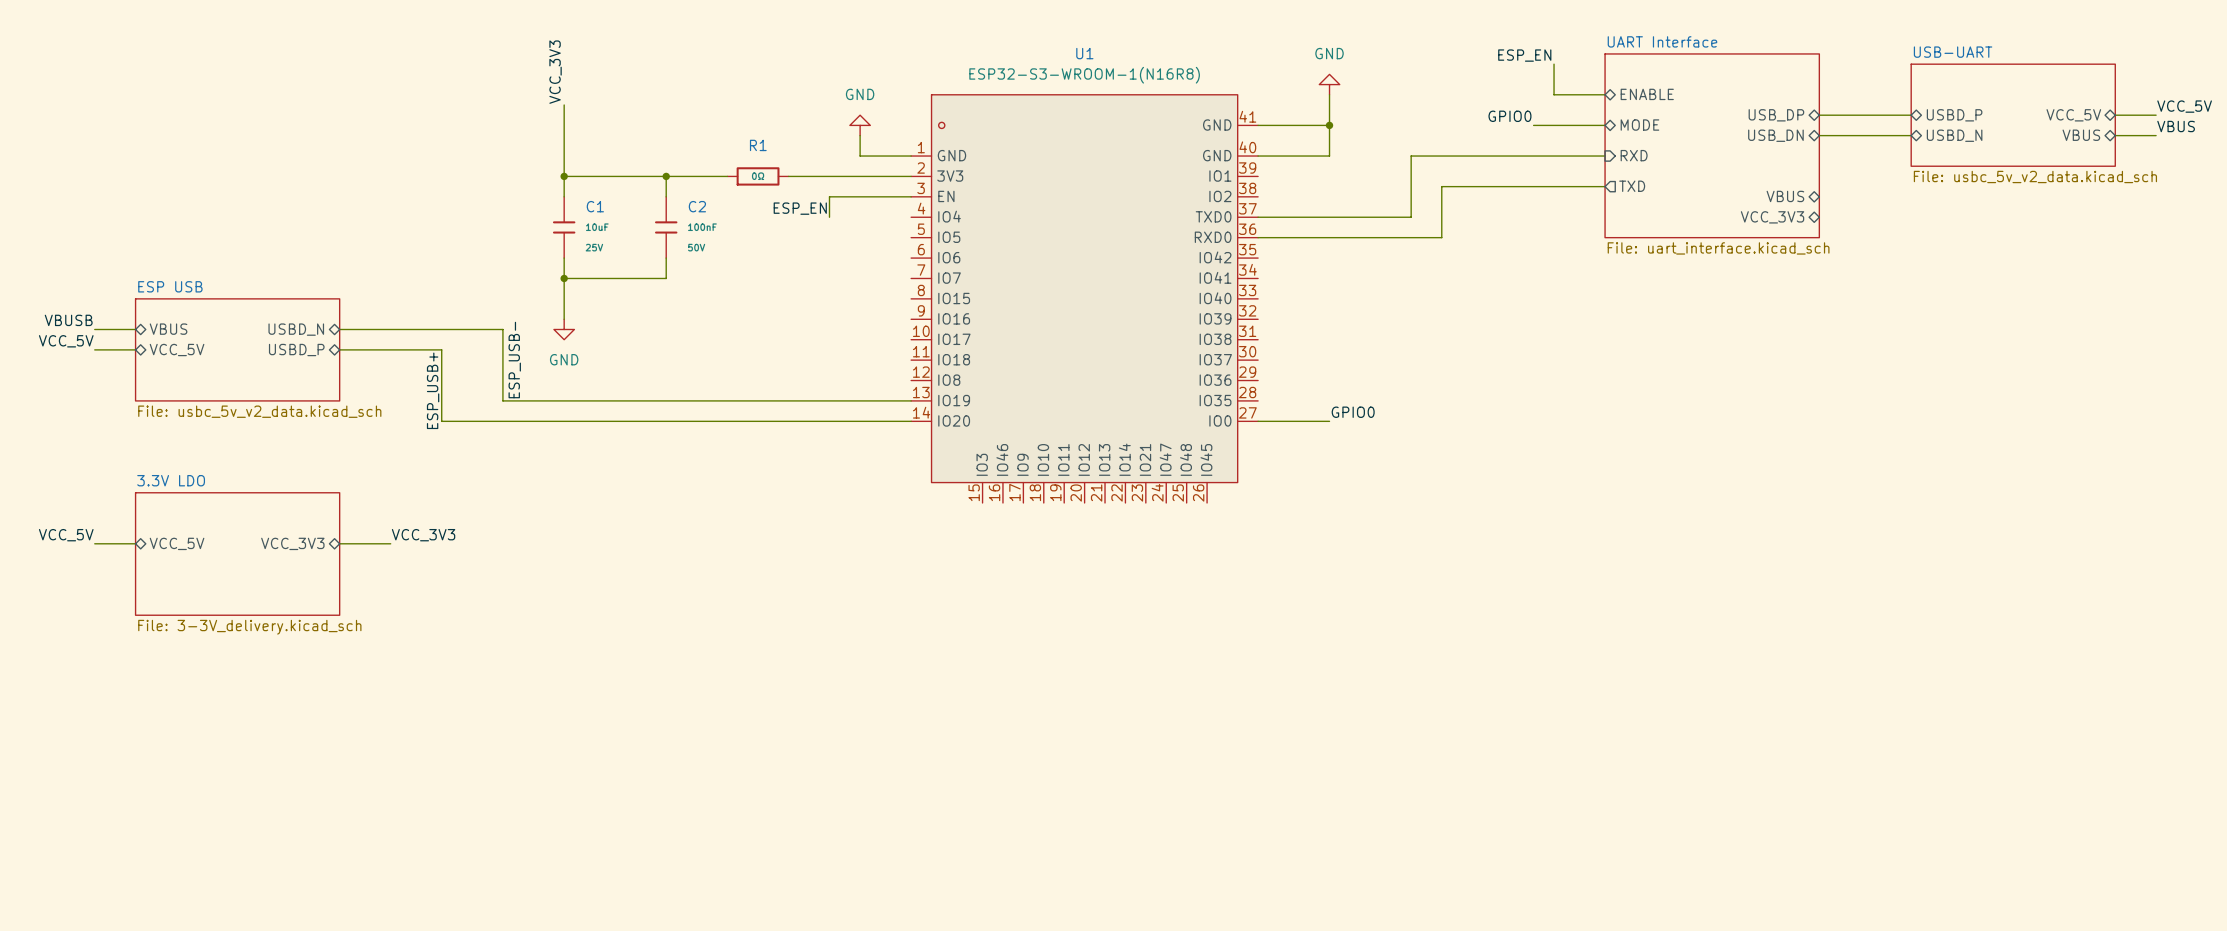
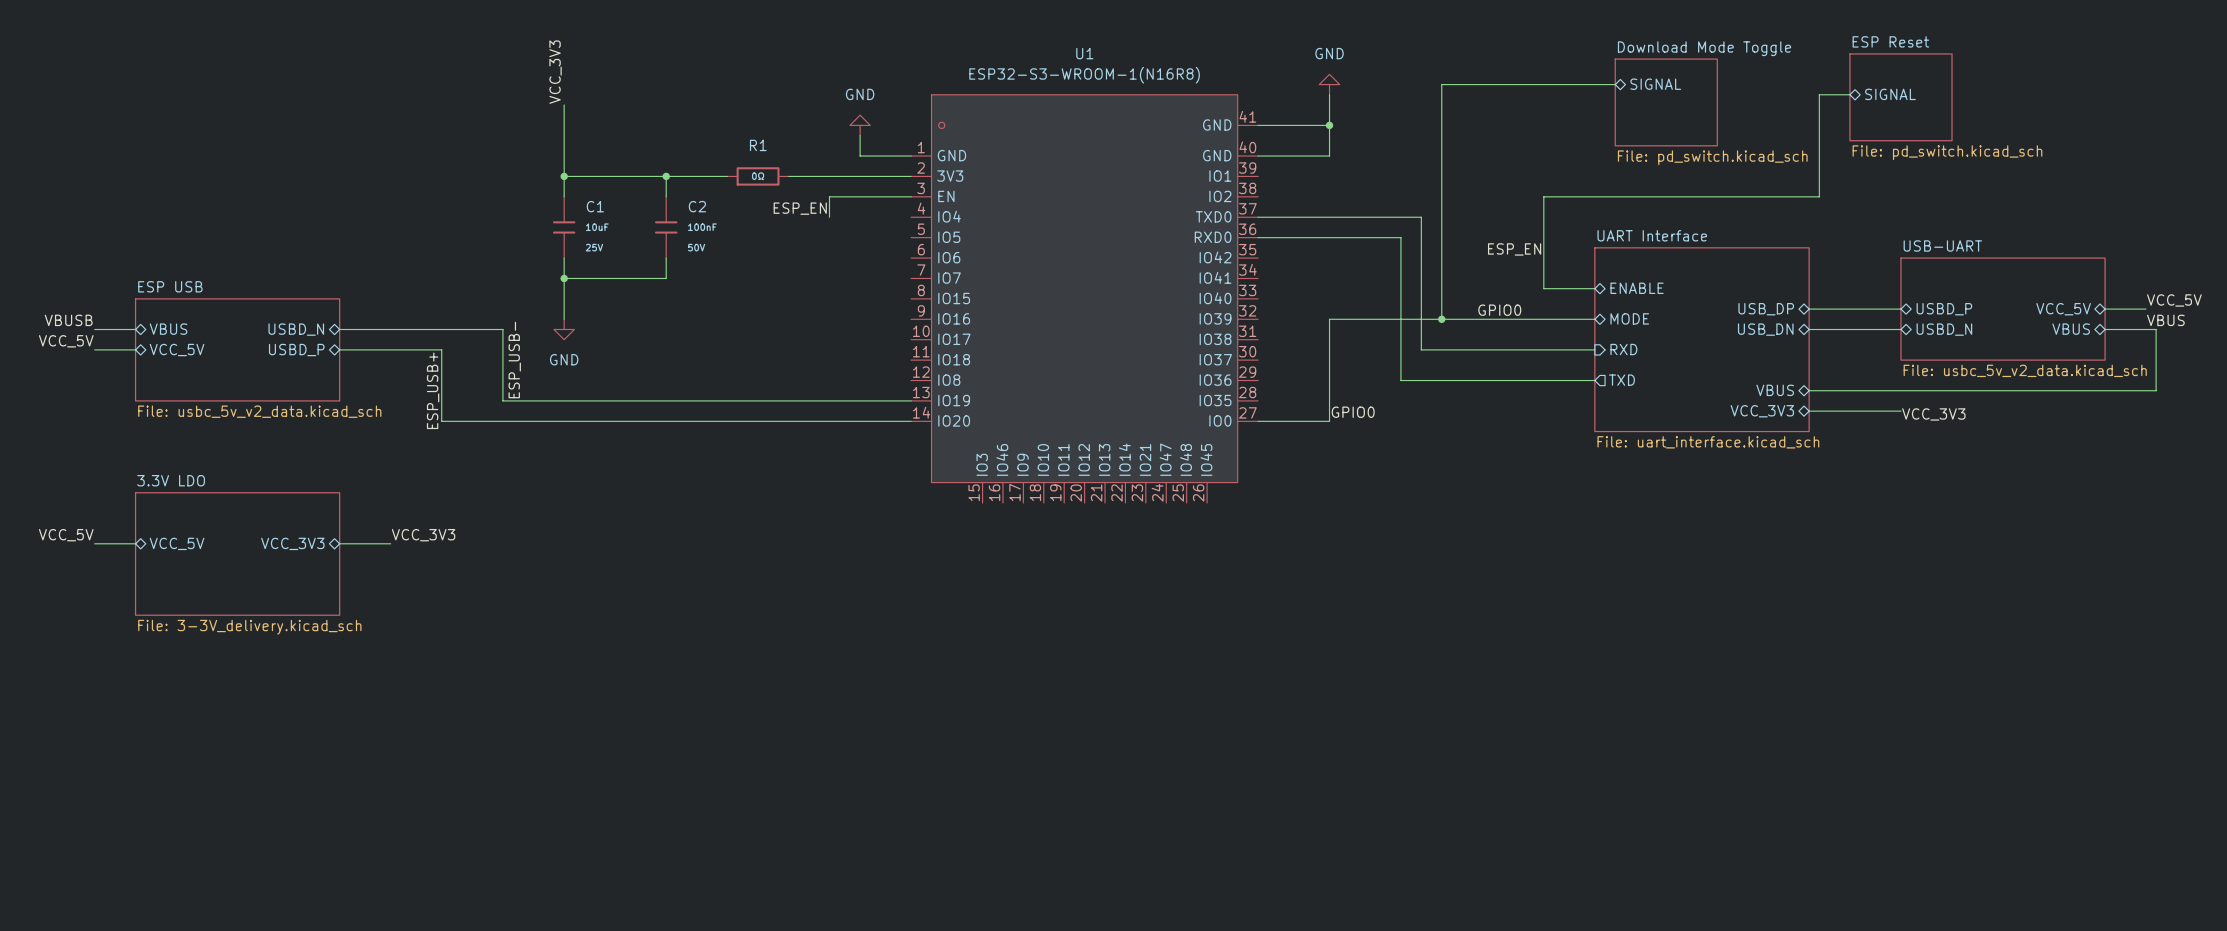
label position: ESP_EN (1524, 55) -> ESP_EN (1514, 249)
wire: (1554, 64) (1554, 94) (1605, 94) -> none
sheet pin: none -> SIGNAL (1655, 84)
sheet pin position: ENABLE (1647, 94) -> ENABLE (1637, 288)
wire: none -> (1849, 94) (1819, 94) (1819, 196) (1543, 196) (1543, 288) (1594, 288)
sheet pin: none -> SIGNAL (1890, 94)
sheet ESP Reset: none -> File: pd_switch.kicad_sch (1900, 97)
sheet Download Mode Toggle: none -> File: pd_switch.kicad_sch (1666, 102)
label position: VCC_5V (2184, 106) -> VCC_5V (2174, 300)
sheet pin position: USB_DP (1776, 115) -> USB_DP (1766, 309)
wire: (1819, 115) (1911, 115) -> (1809, 309) (1900, 309)
sheet pin position: USBD_P (1954, 115) -> USBD_P (1944, 309)
sheet USB-UART position: (2013, 115) -> (2003, 309)
sheet pin position: VCC_5V (2073, 115) -> VCC_5V (2063, 309)
wire: (2115, 115) (2156, 115) -> (2105, 309) (2145, 309)
label position: GPIO0 (1509, 116) -> GPIO0 (1499, 310)
wire: (1533, 125) (1605, 125) -> none
sheet pin position: MODE (1639, 125) -> MODE (1629, 318)
label position: VBUS (2176, 126) -> VBUS (2165, 320)
sheet pin position: USB_DN (1775, 135) -> USB_DN (1765, 329)
wire: (1819, 135) (1911, 135) -> (1809, 329) (1900, 329)
sheet pin position: USBD_N (1954, 135) -> USBD_N (1944, 329)
sheet pin: VBUS (2081, 135) -> none
wire: (2115, 135) (2156, 135) -> none
sheet UART Interface position: (1712, 145) -> (1701, 339)
sheet pin position: RXD (1634, 155) -> RXD (1623, 349)
wire: (1605, 156) (1411, 156) (1411, 217) -> (1594, 349) (1421, 349) (1421, 217) (1411, 217)
wire: (1441, 186) (1605, 186) -> (1441, 186) (1441, 84) (1615, 84)
sheet pin position: TXD (1632, 186) -> TXD (1621, 380)
sheet pin: VBUS (1785, 196) -> none
sheet pin position: VCC_3V3 (1772, 217) -> VCC_3V3 (1762, 411)
wire: (1400, 237) (1441, 237) -> (1441, 319) (1441, 237)
wire: none -> (1400, 237) (1400, 380) (1594, 380)
junction: none -> (1441, 319)
wire: none -> (1594, 319) (1329, 319) (1329, 421)
sheet pin: none -> VBUS (2071, 329)
wire: none -> (2105, 329) (2156, 329) (2156, 390) (1809, 390)
sheet pin: none -> VBUS (1775, 390)
wire: none -> (1809, 411) (1900, 411)
label: none -> VCC_3V3 (1933, 414)

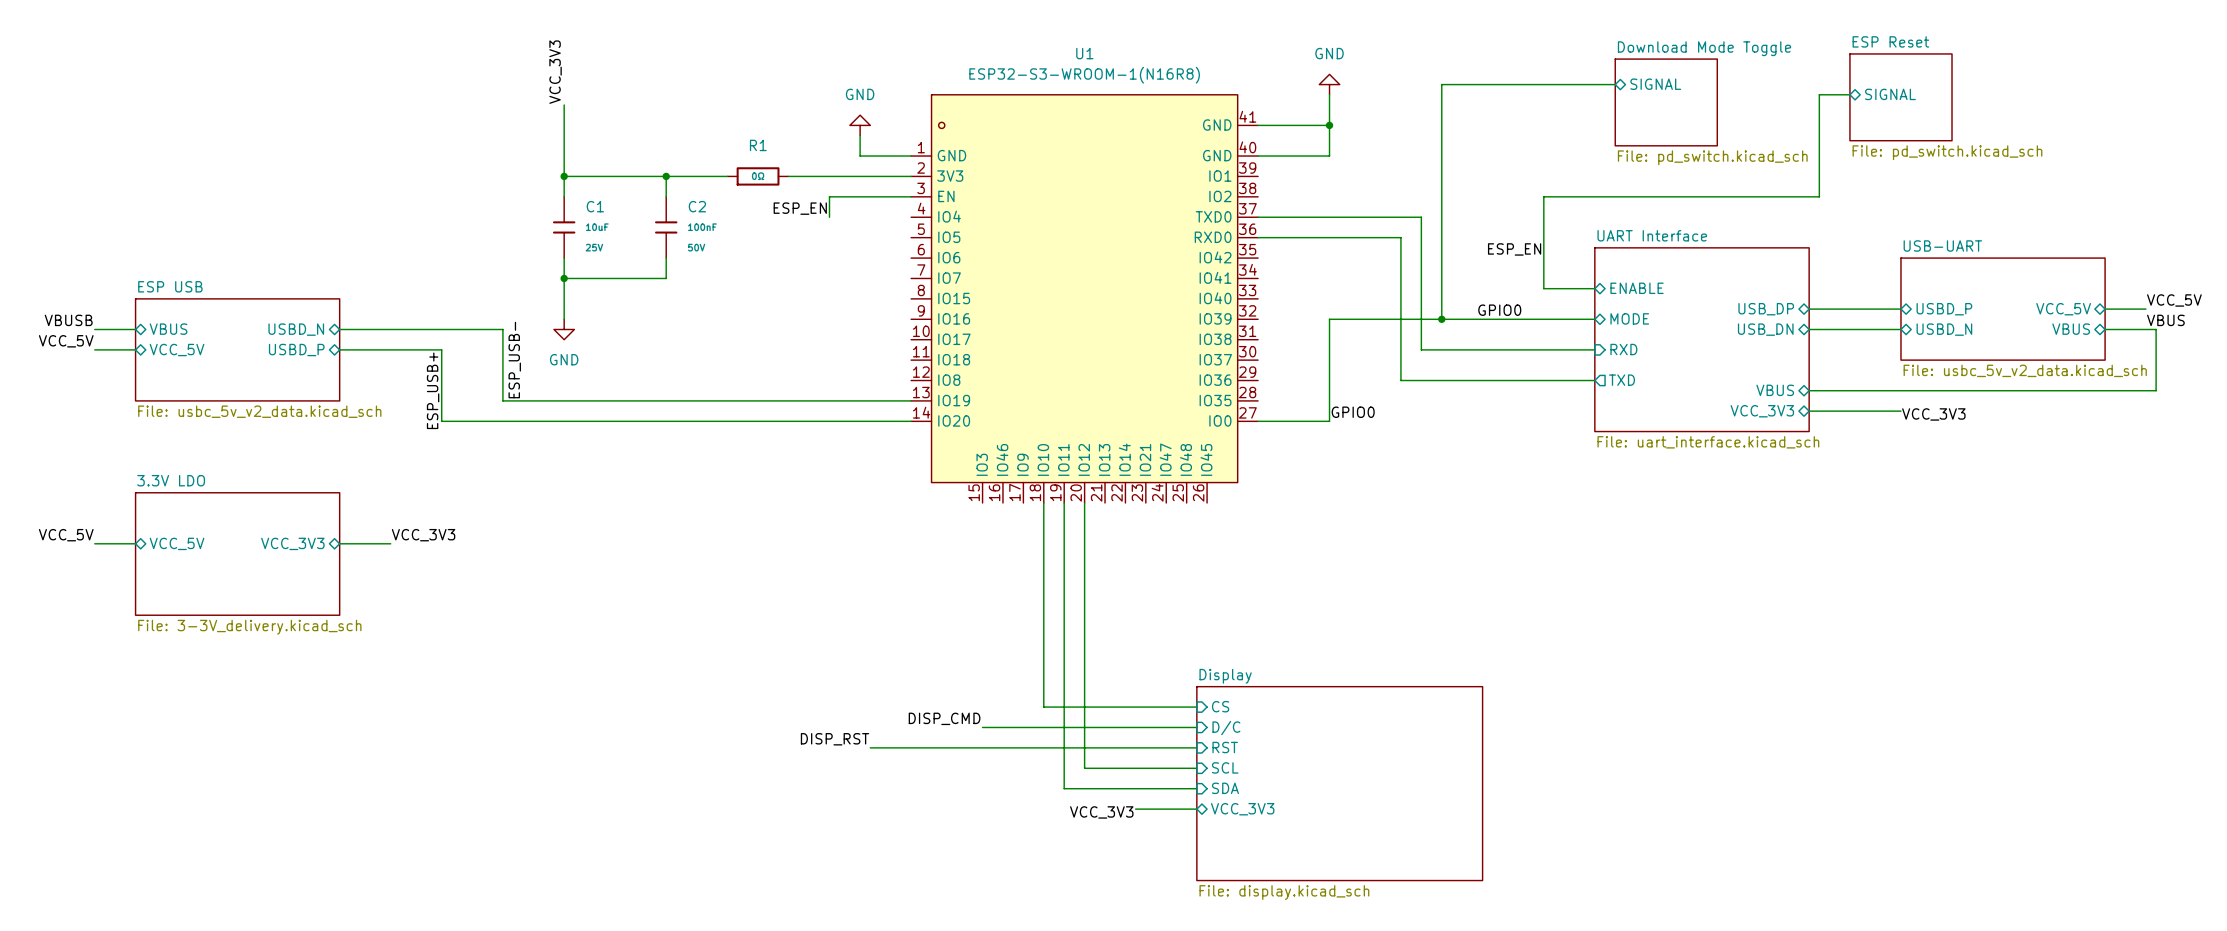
wire: none -> (1043, 502) (1043, 707) (1196, 707)
wire: none -> (1064, 502) (1064, 788) (1196, 788)
wire: none -> (1084, 502) (1084, 768) (1196, 768)
sheet pin: none -> CS (1220, 706)
label: none -> DISP_CMD (944, 718)
wire: none -> (982, 727) (1196, 727)
sheet pin: none -> D/C (1226, 728)
label: none -> DISP_RST (835, 739)
wire: none -> (870, 747) (1196, 747)
sheet pin: none -> RST (1225, 747)
sheet pin: none -> SCL (1225, 767)
sheet Display: none -> File: display.kicad_sch (1339, 783)
sheet pin: none -> SDA (1225, 788)
wire: none -> (1135, 809) (1196, 809)
sheet pin: none -> VCC_3V3 (1242, 809)
label: none -> VCC_3V3 (1101, 812)

